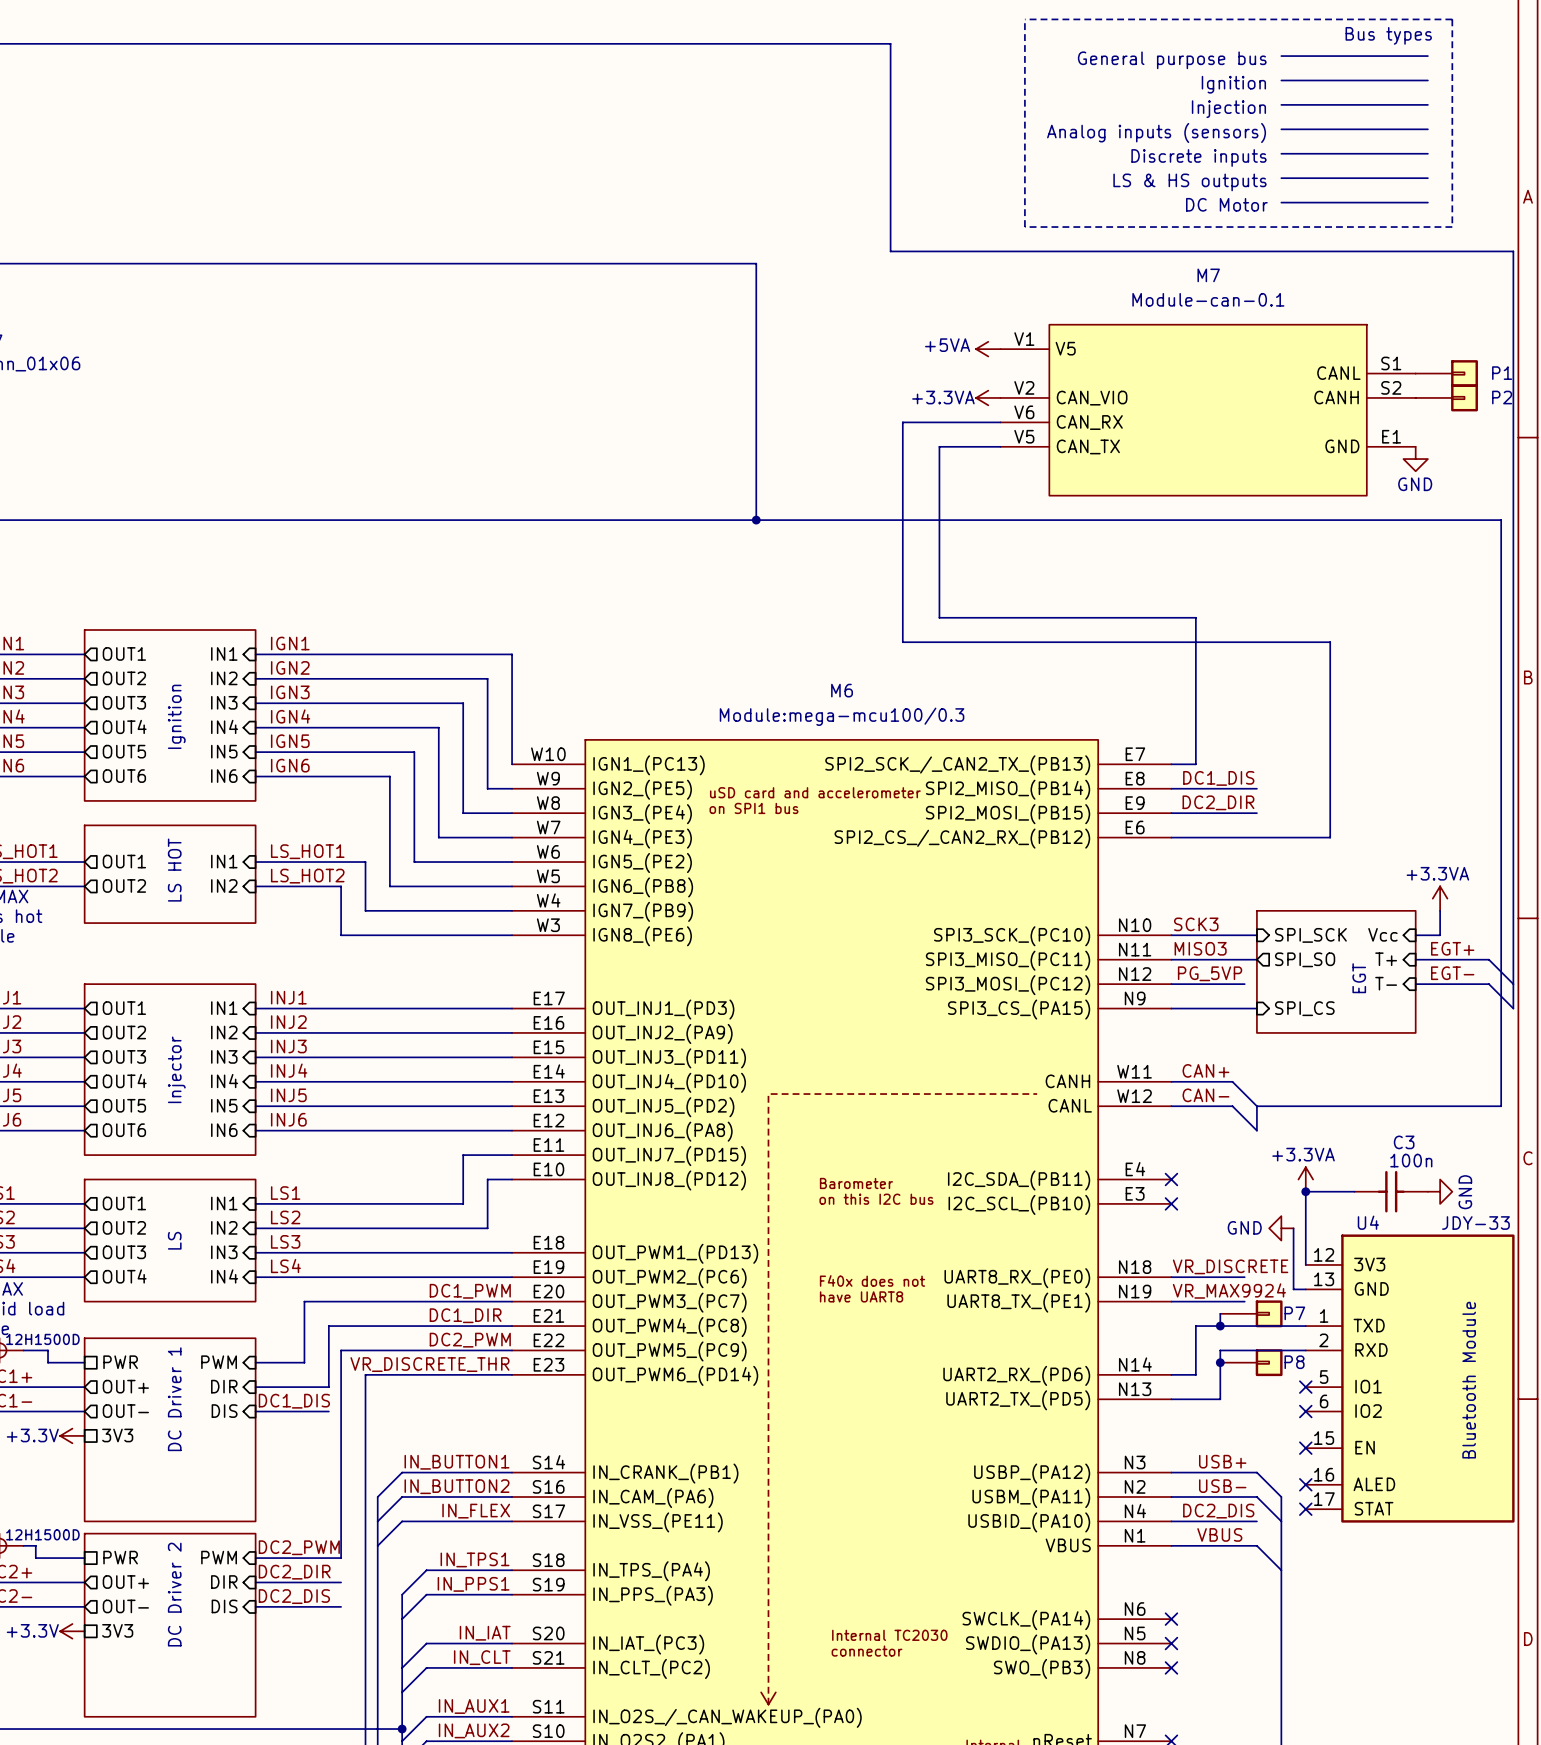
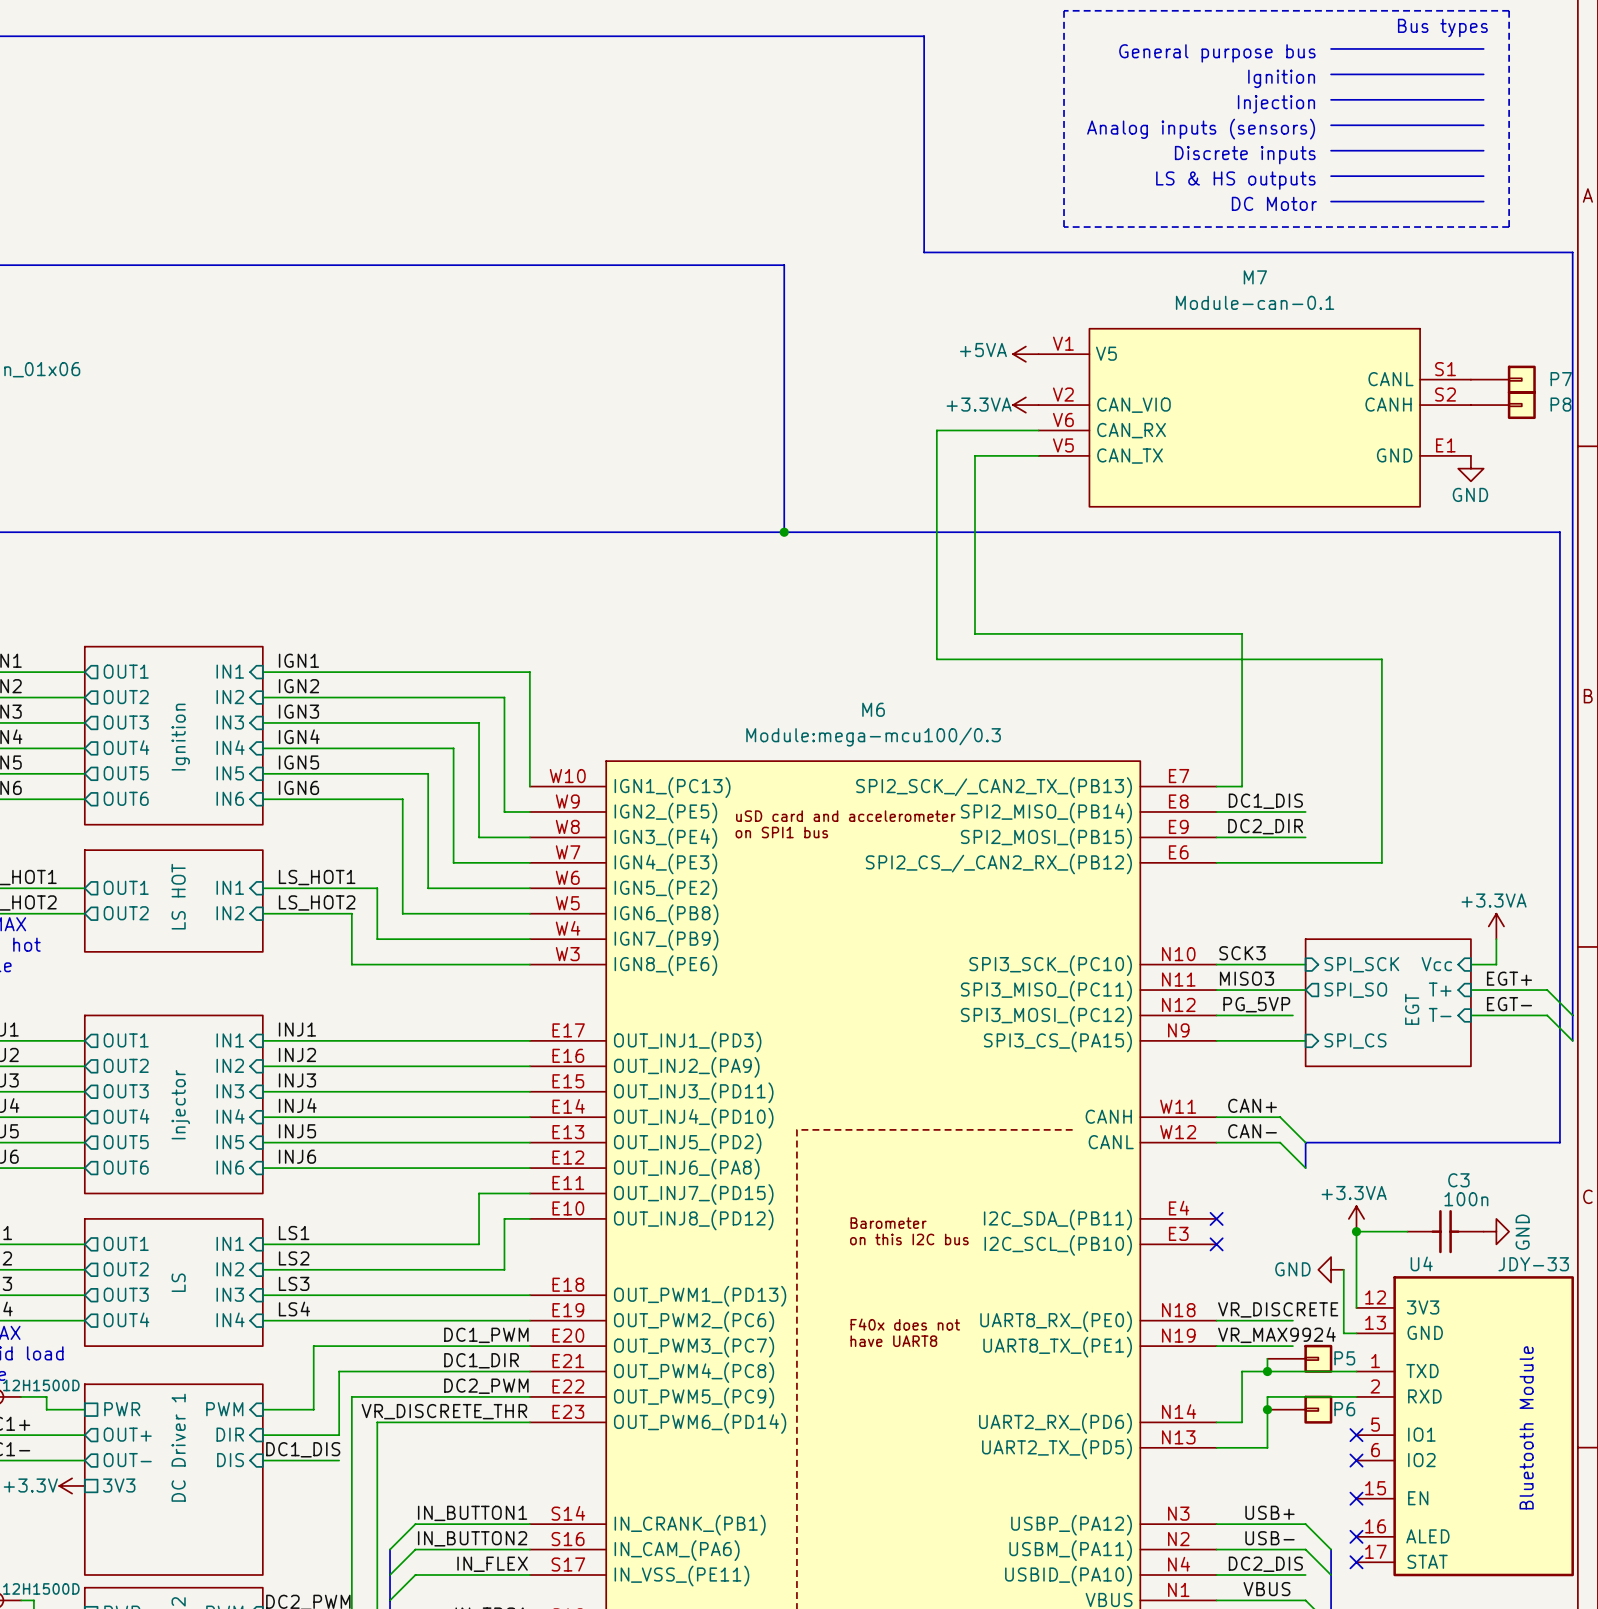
P1 name: P1 (1502, 373) -> P7 (1561, 379)
P2 name: P2 (1502, 397) -> P8 (1560, 404)
P7 name: P7 (1294, 1313) -> P5 (1344, 1358)
P8 name: P8 (1294, 1362) -> P6 (1344, 1409)

